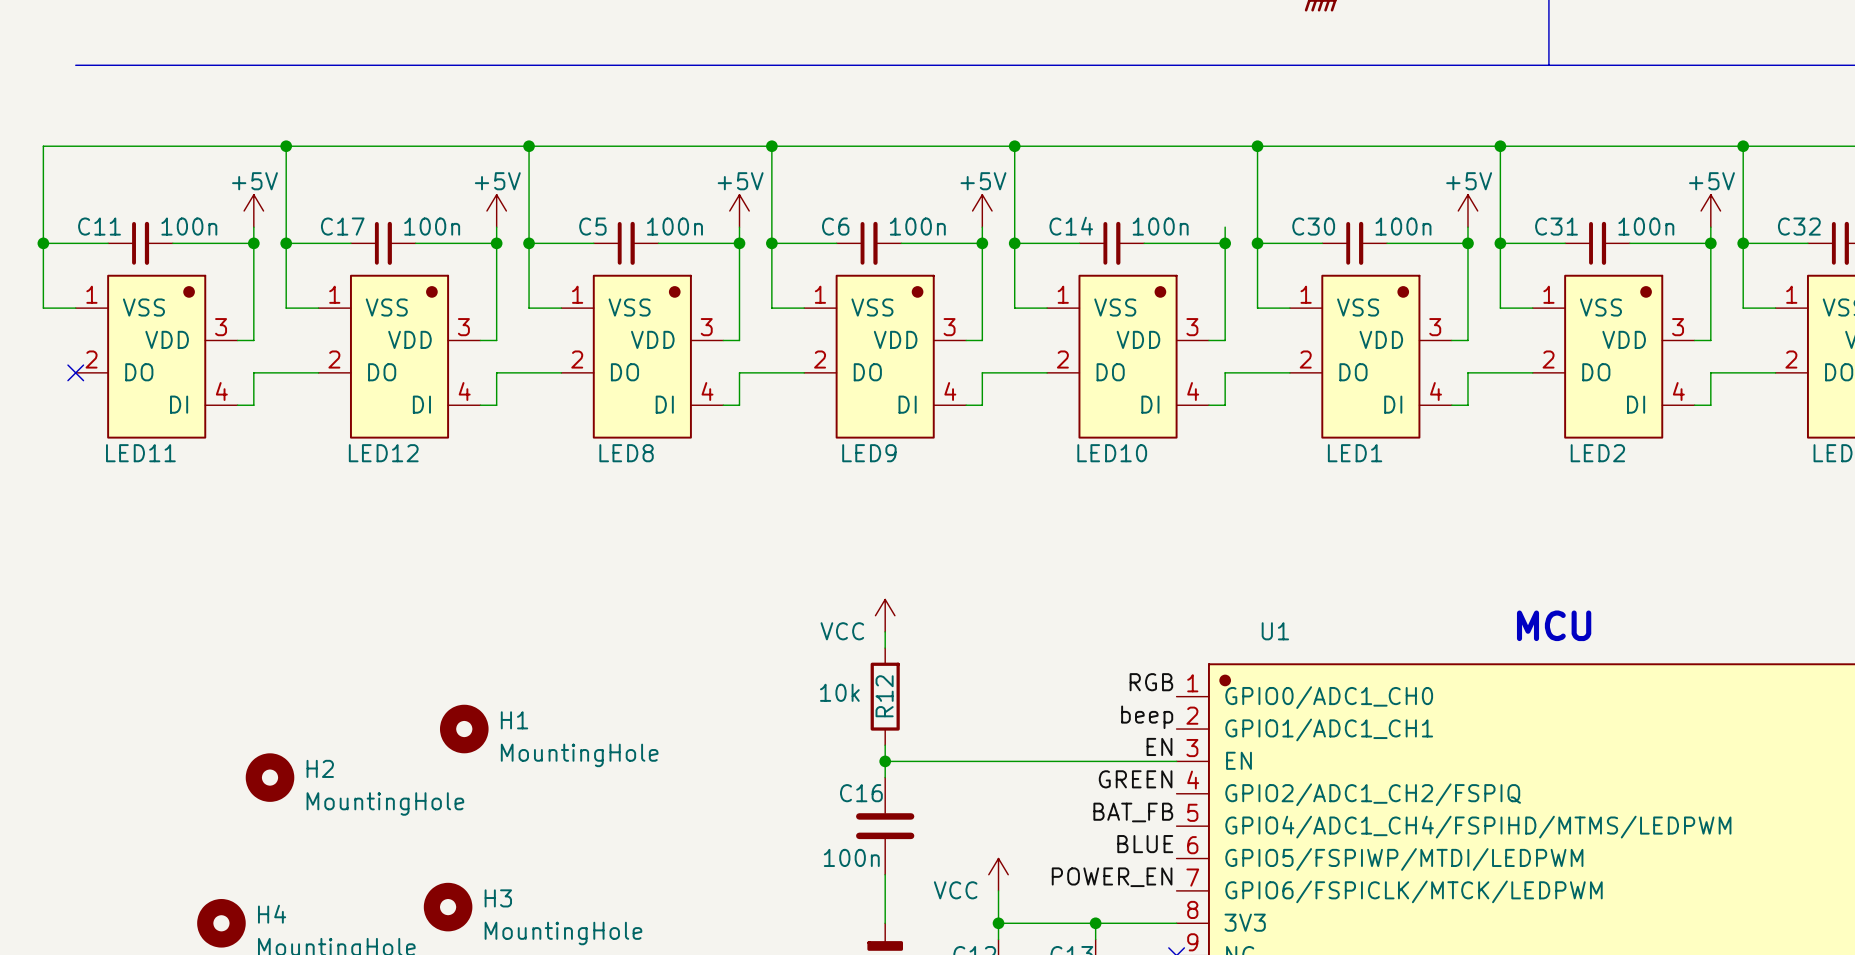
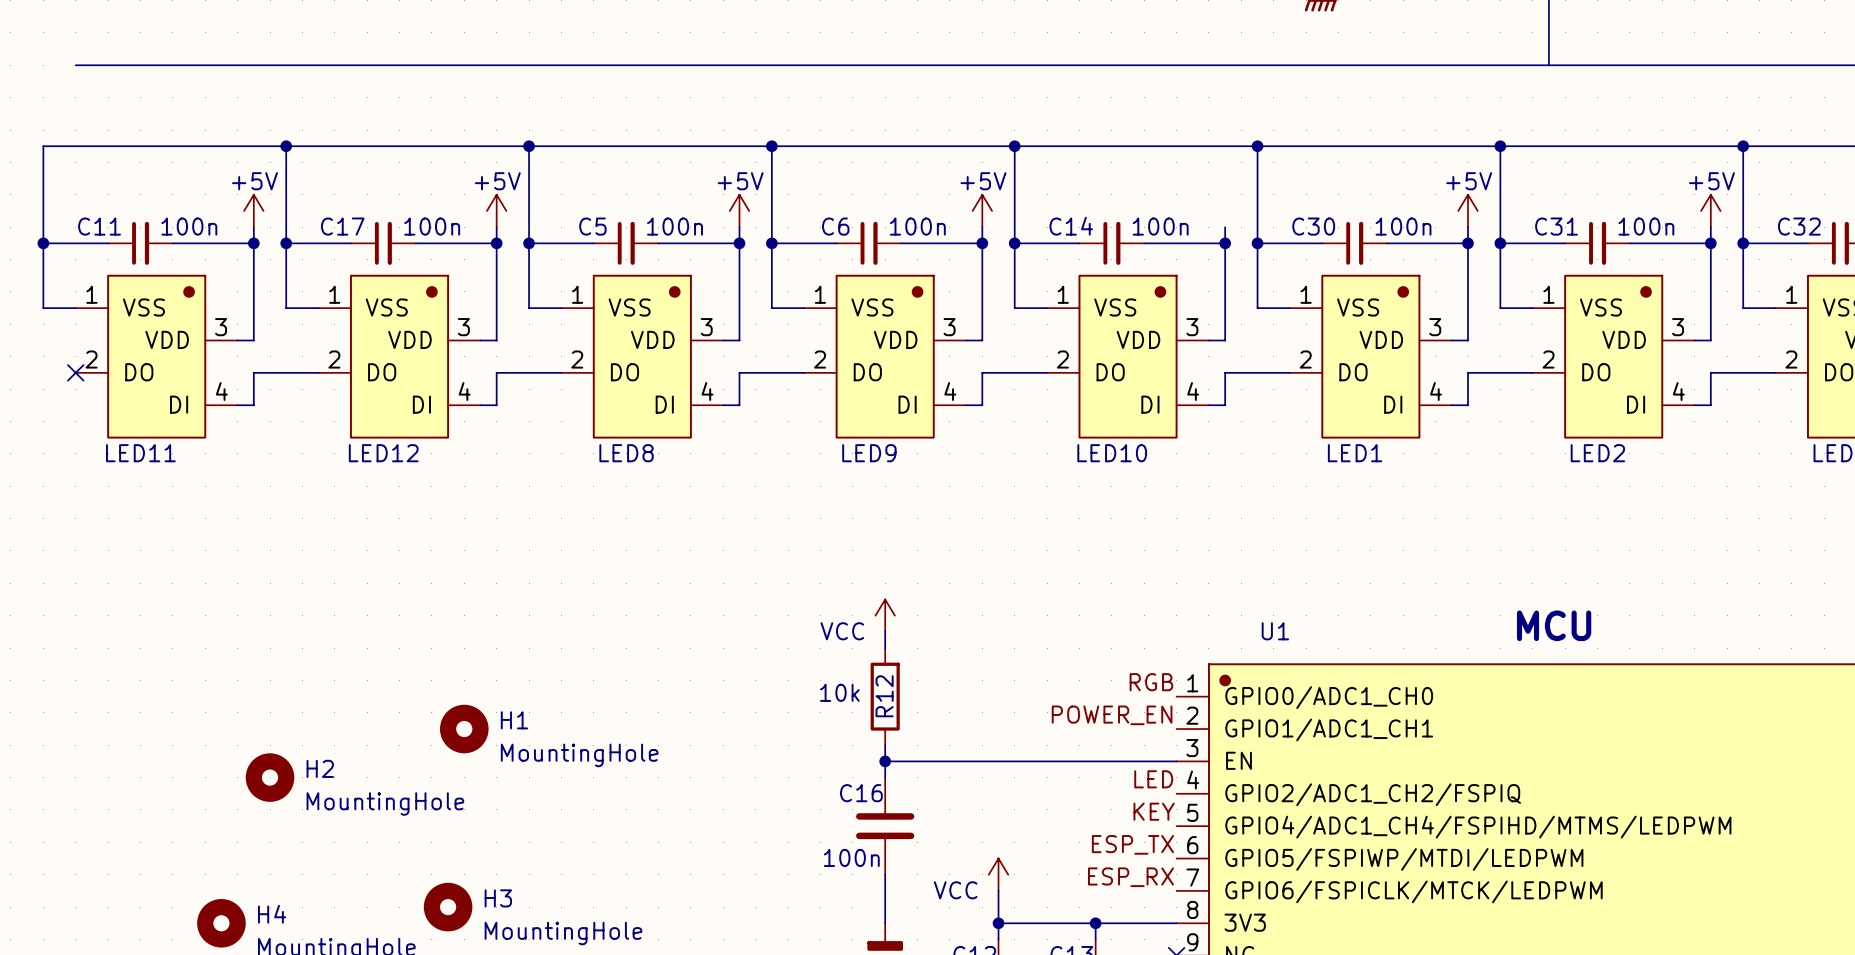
label: beep (1147, 717) -> POWER_EN (1112, 715)
label: EN (1159, 746) -> none
label: GREEN (1135, 779) -> LED (1153, 779)
label: BAT_FB (1133, 812) -> KEY (1154, 811)
label: BLUE (1145, 844) -> ESP_TX (1132, 844)
label: POWER_EN (1112, 877) -> ESP_RX (1130, 877)

